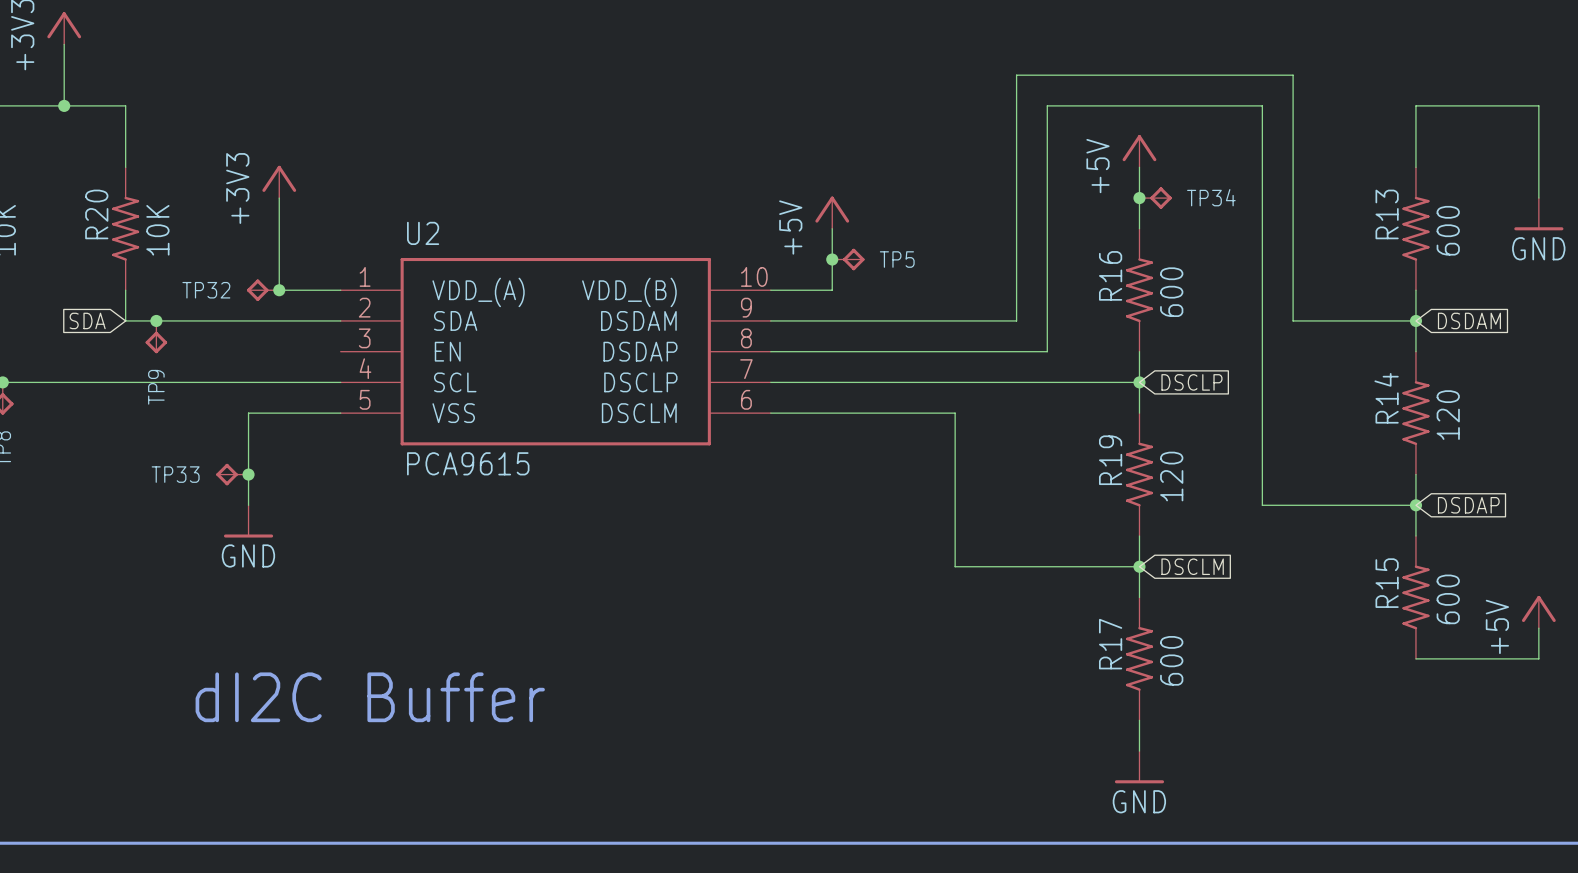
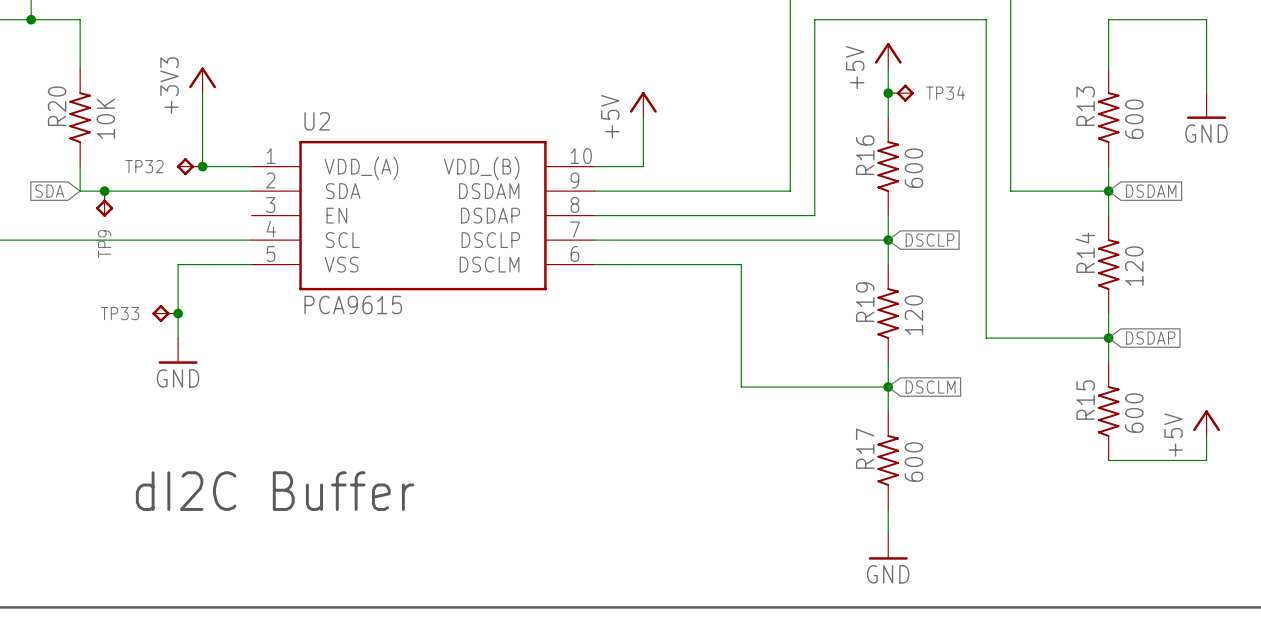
junction: (832, 259) -> none
TP5: (848, 259) -> none

